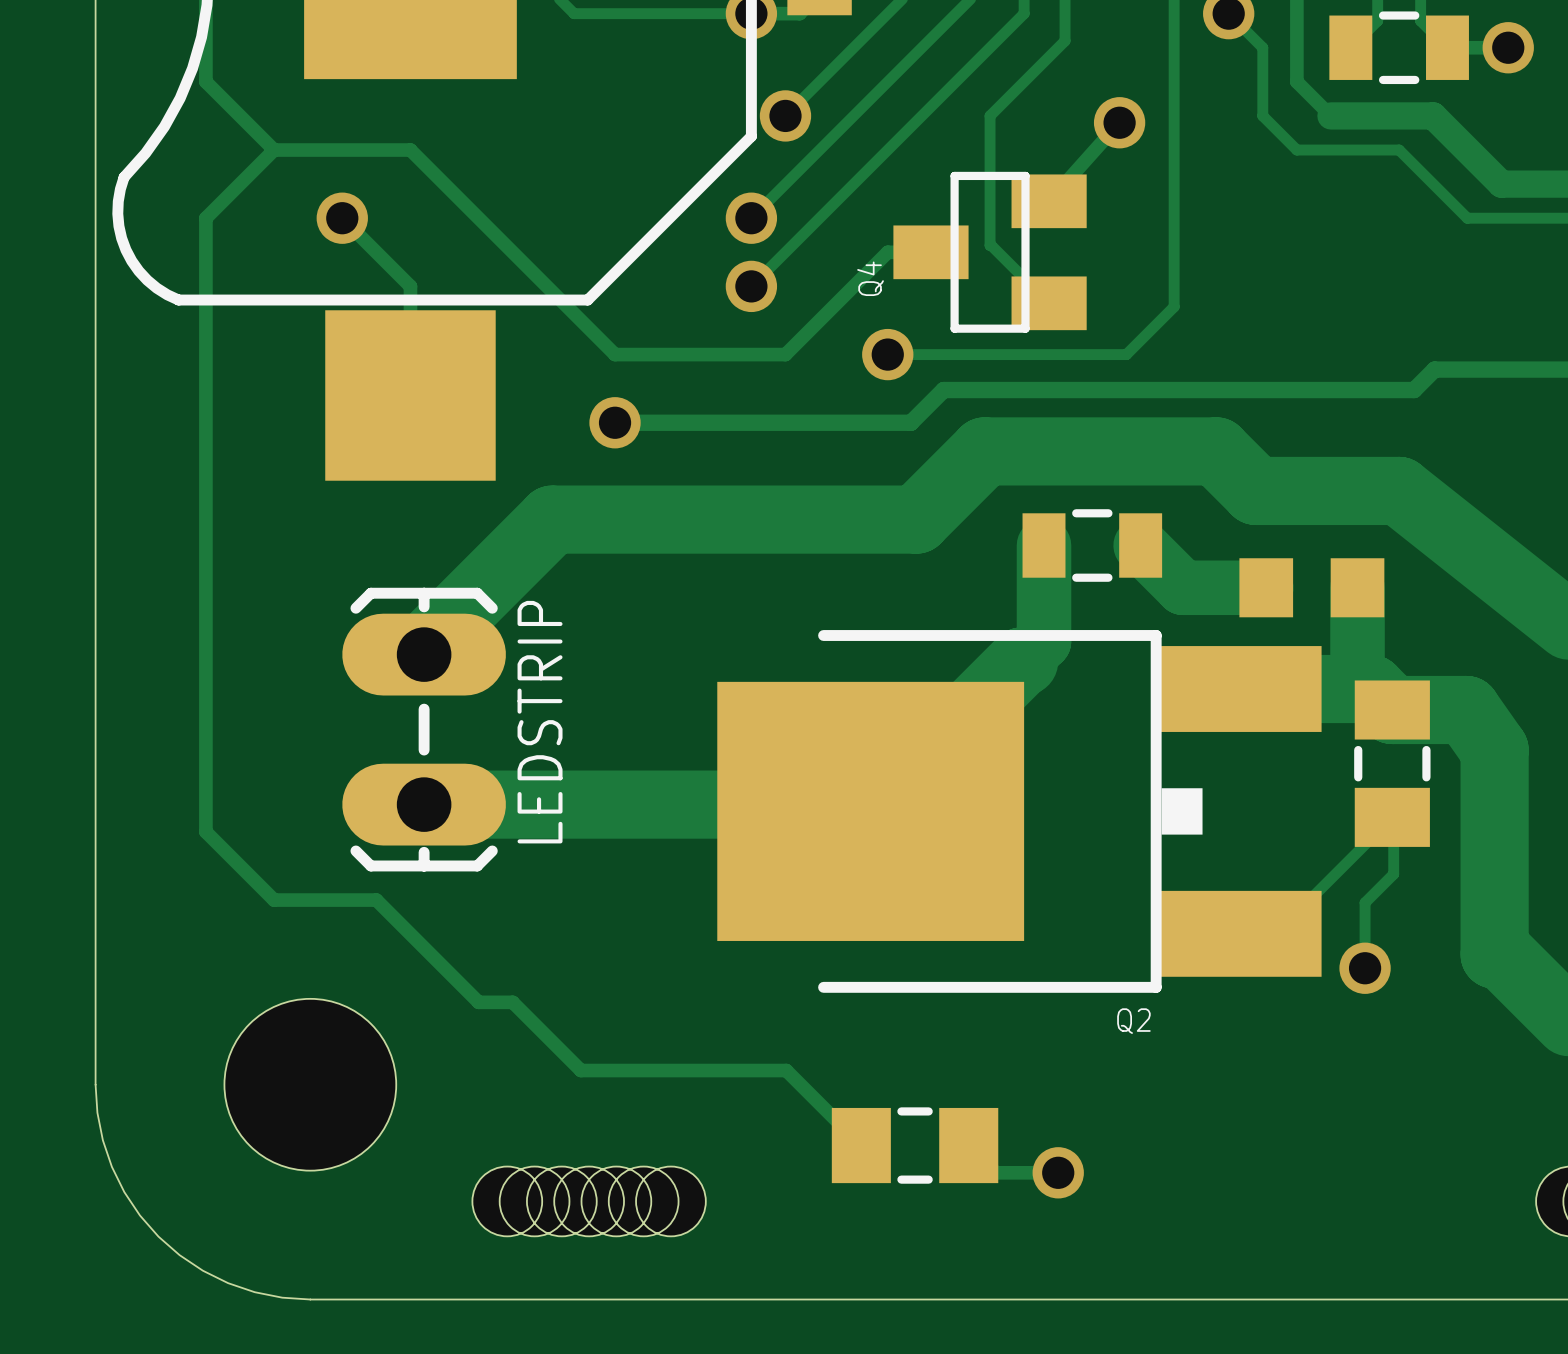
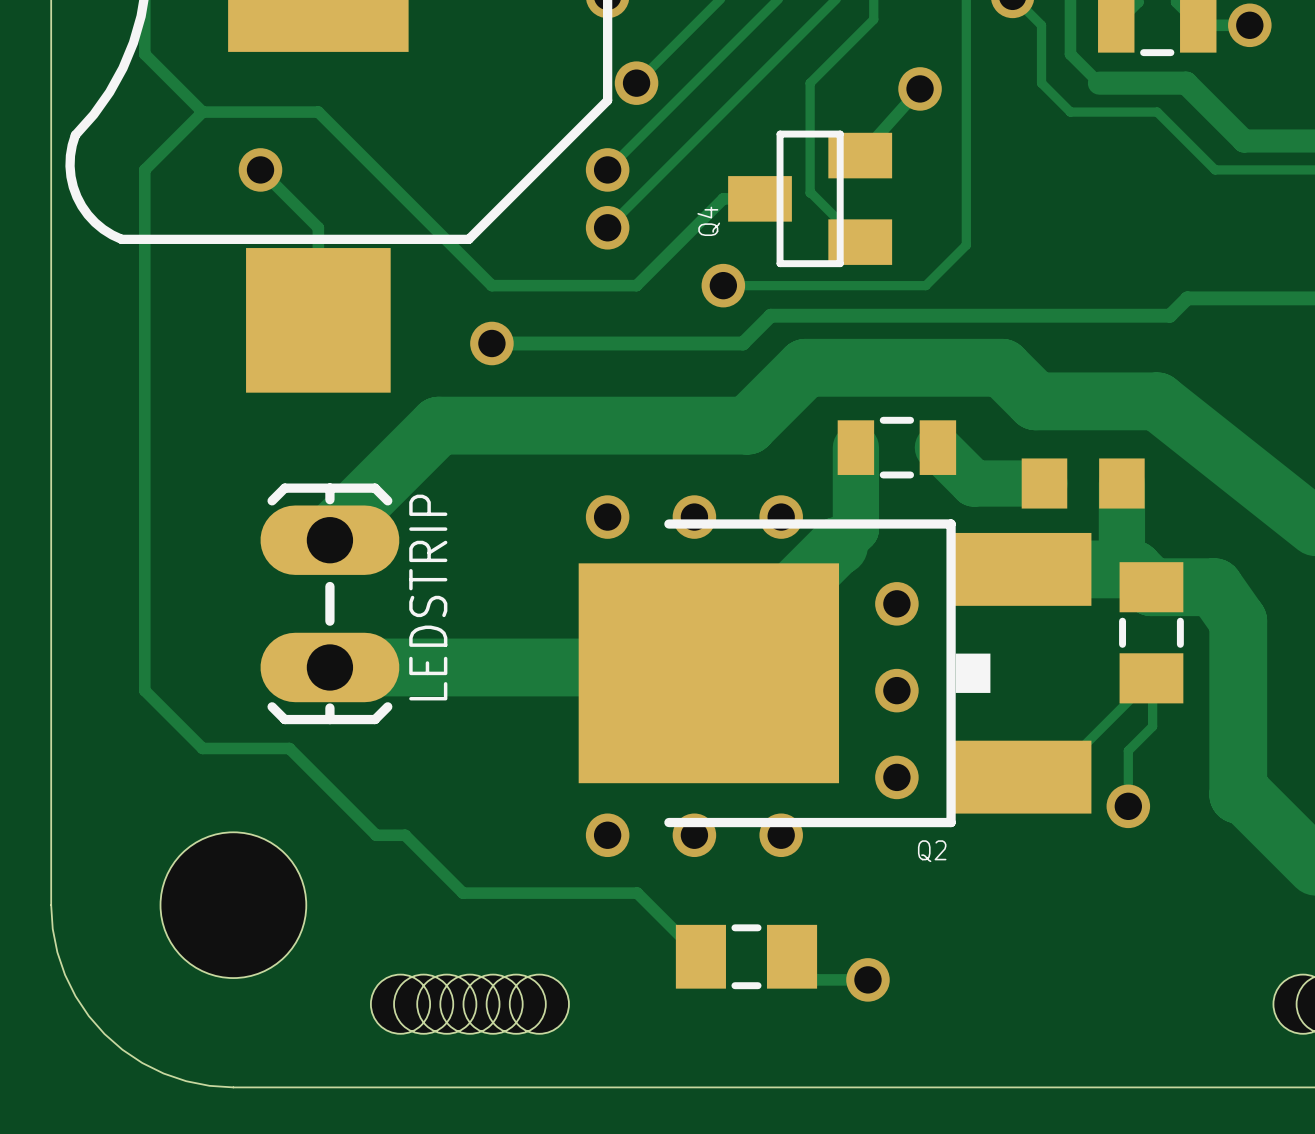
via: none -> (607, 517)
via: none -> (694, 517)
via: none -> (781, 517)
via: none -> (896, 603)
via: none -> (896, 690)
via: none -> (896, 777)
via: none -> (607, 835)
via: none -> (694, 835)
via: none -> (781, 835)

